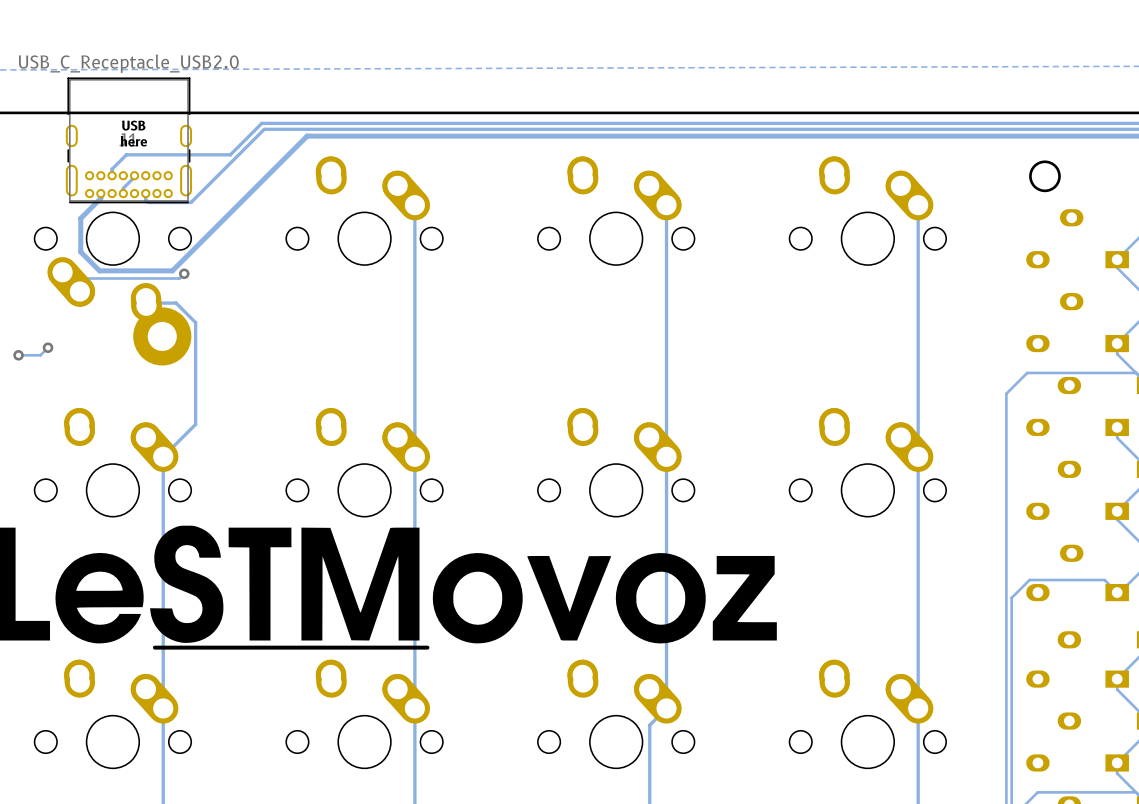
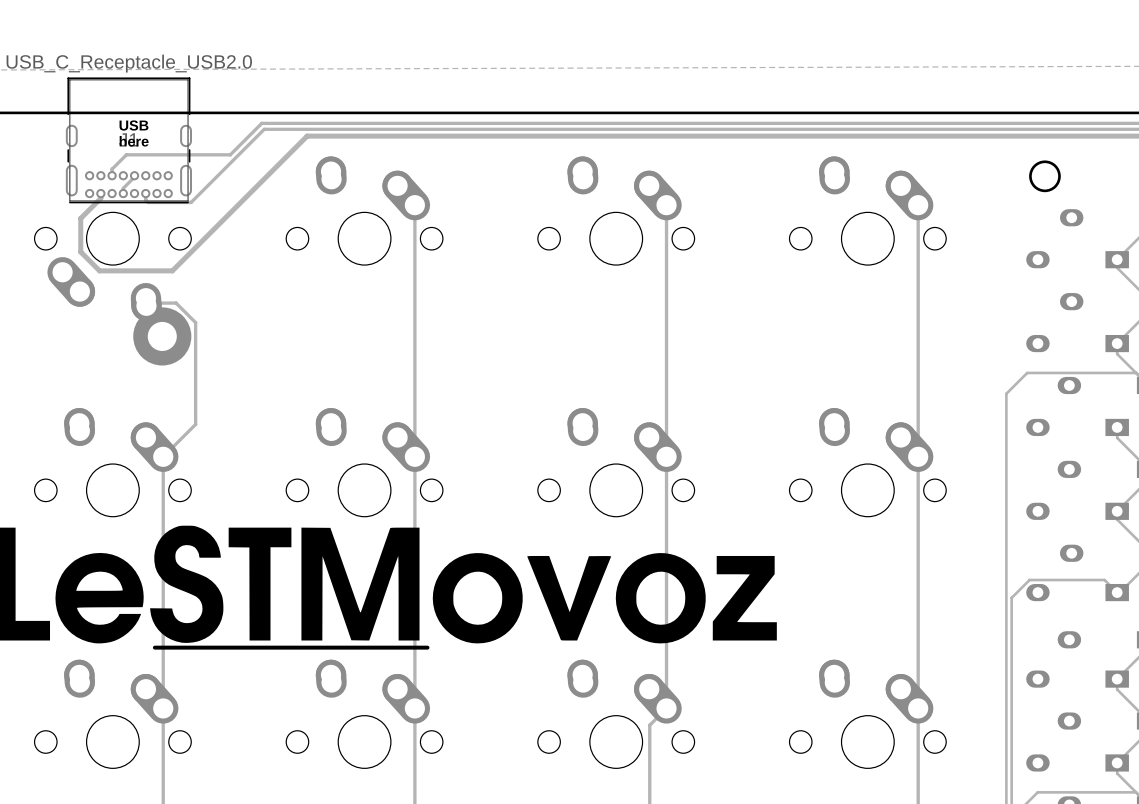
track: (62, 272) (68, 278) (179, 278) (184, 273) -> none
via: (184, 273) -> none
track: (48, 347) (40, 355) (18, 355) -> none
via: (48, 347) -> none
via: (18, 355) -> none

